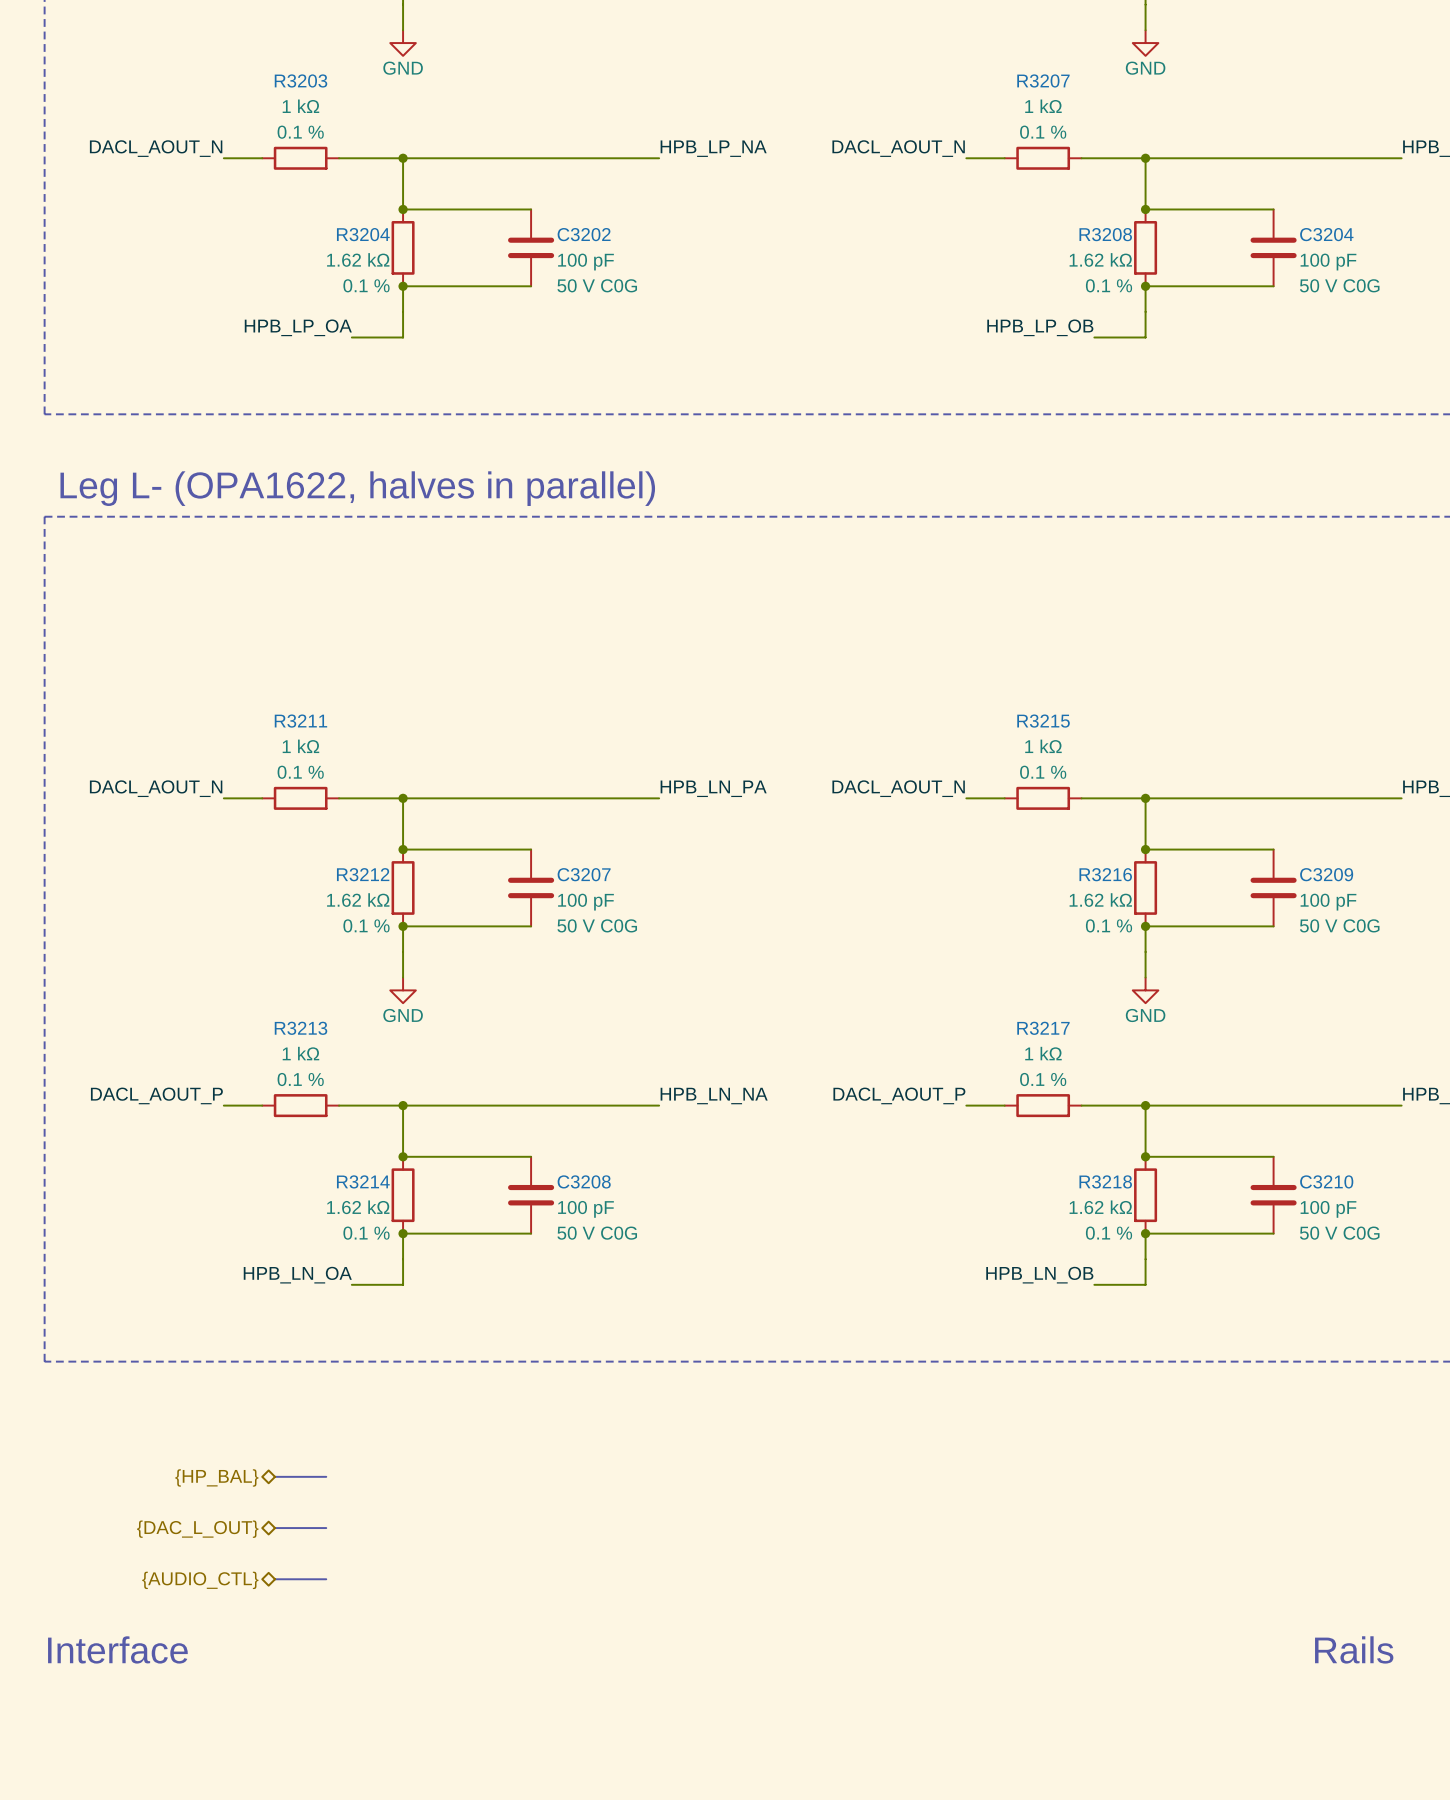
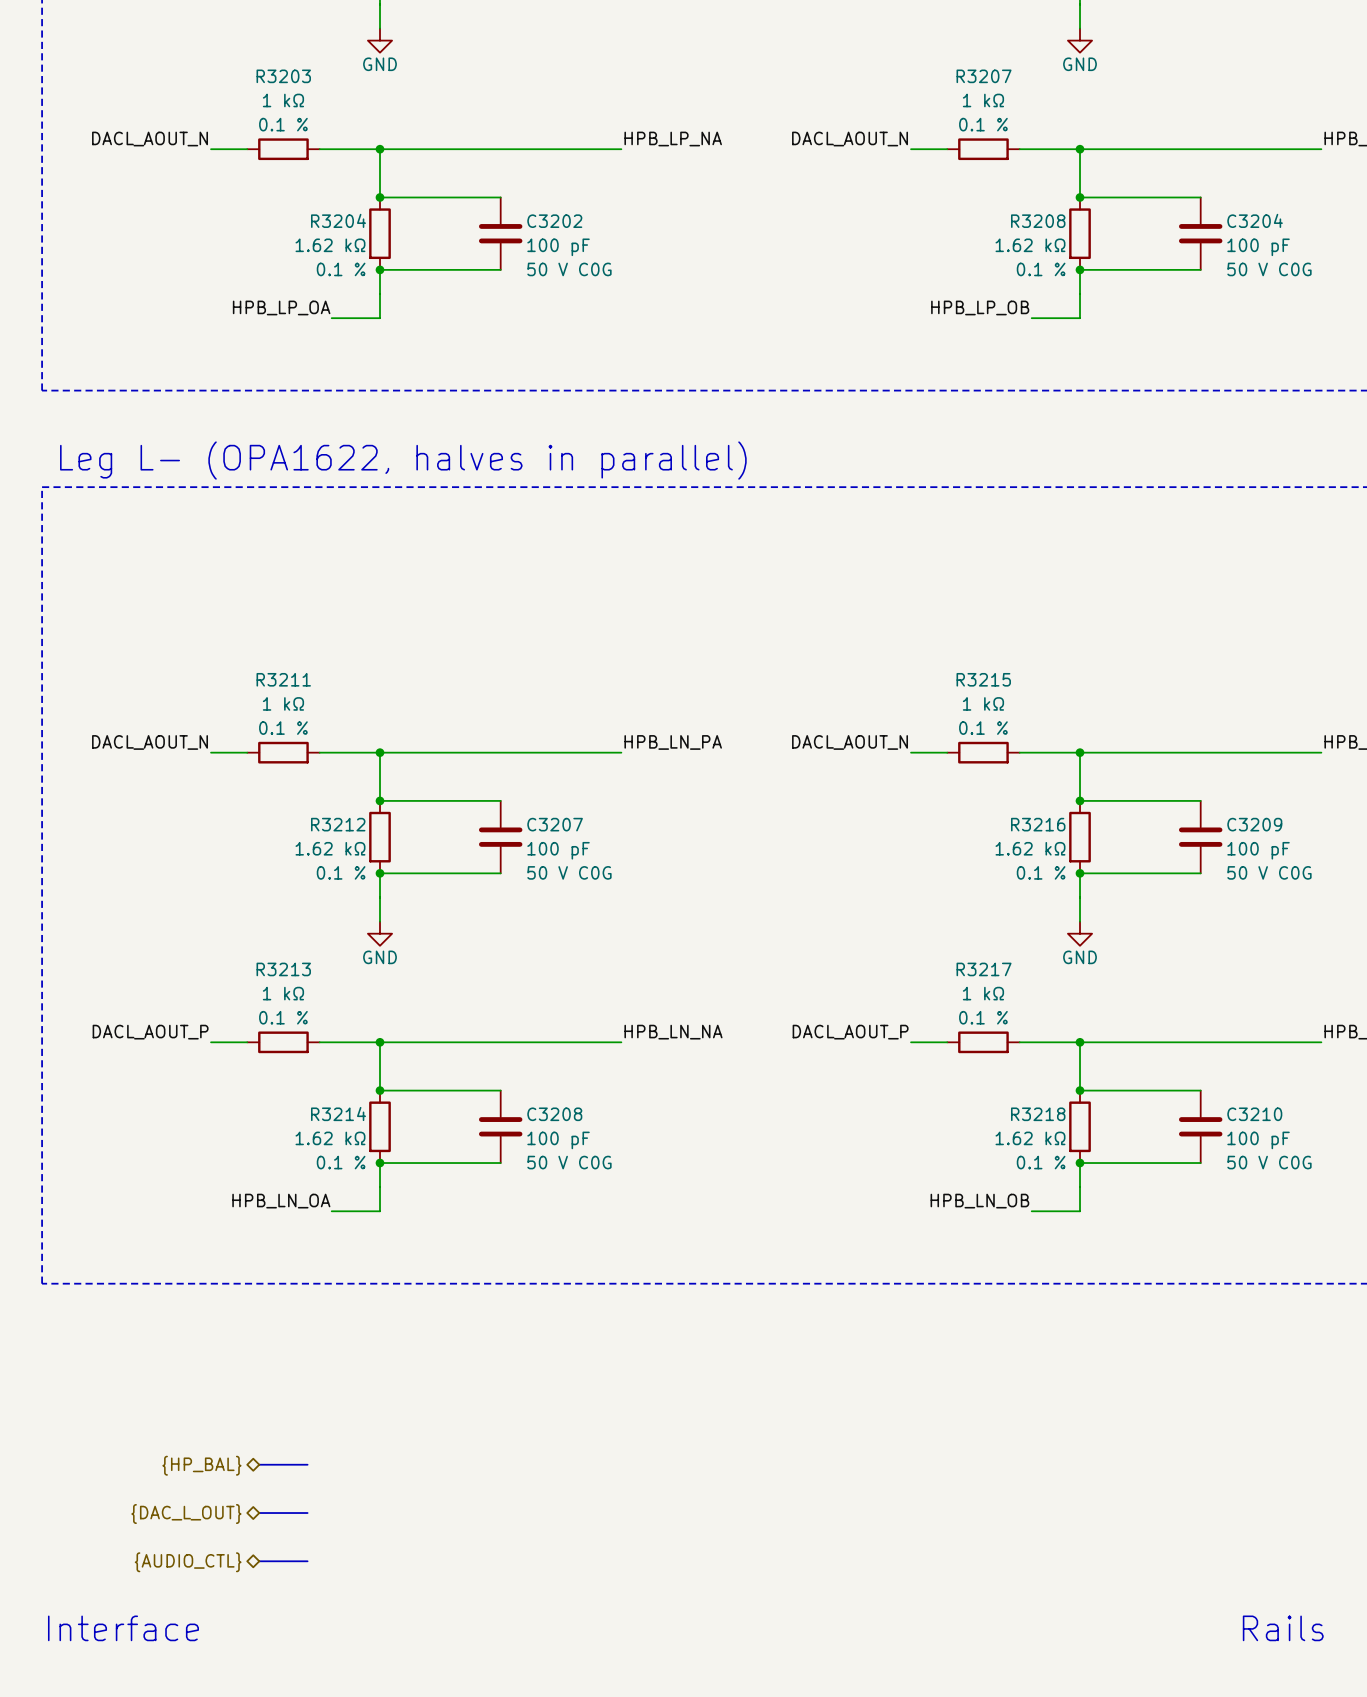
bus: (275, 1476) (326, 1476) -> (259, 1464) (307, 1464)
hierarchical label position: {HP_BAL} (216, 1477) -> {HP_BAL} (201, 1465)
bus: (275, 1528) (326, 1528) -> (259, 1513) (307, 1513)
hierarchical label position: {DAC_L_OUT} (197, 1529) -> {DAC_L_OUT} (186, 1513)
bus: (275, 1579) (326, 1579) -> (259, 1561) (307, 1561)
hierarchical label position: {AUDIO_CTL} (200, 1580) -> {AUDIO_CTL} (188, 1562)
text position: Interface (117, 1649) -> Interface (123, 1628)
text position: Rails (1354, 1649) -> Rails (1283, 1628)

